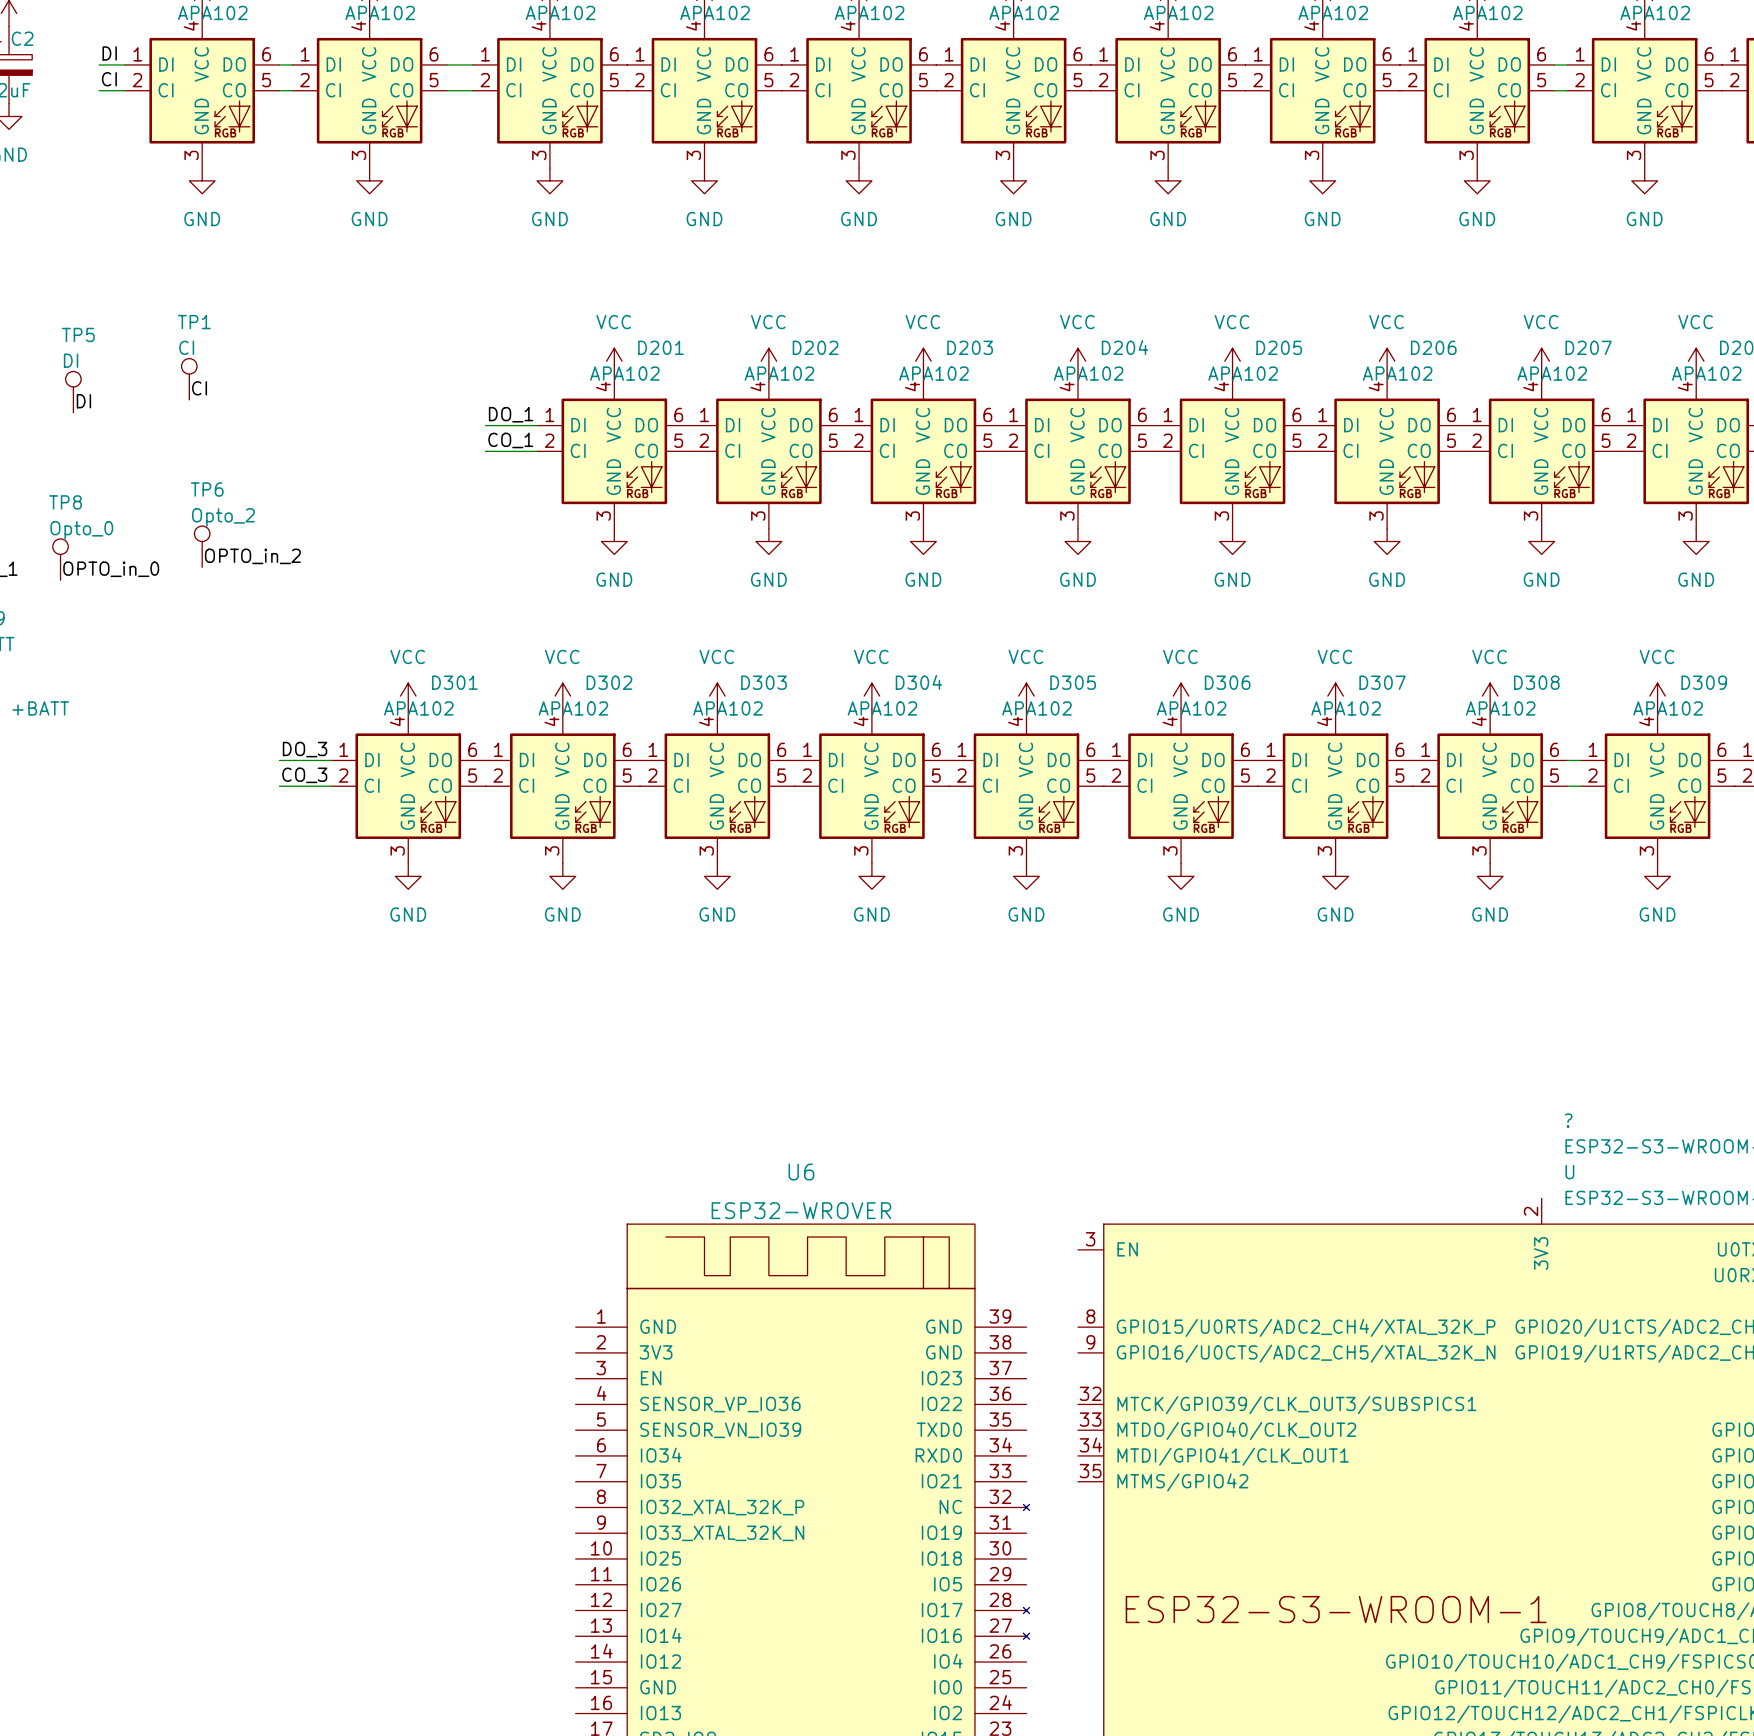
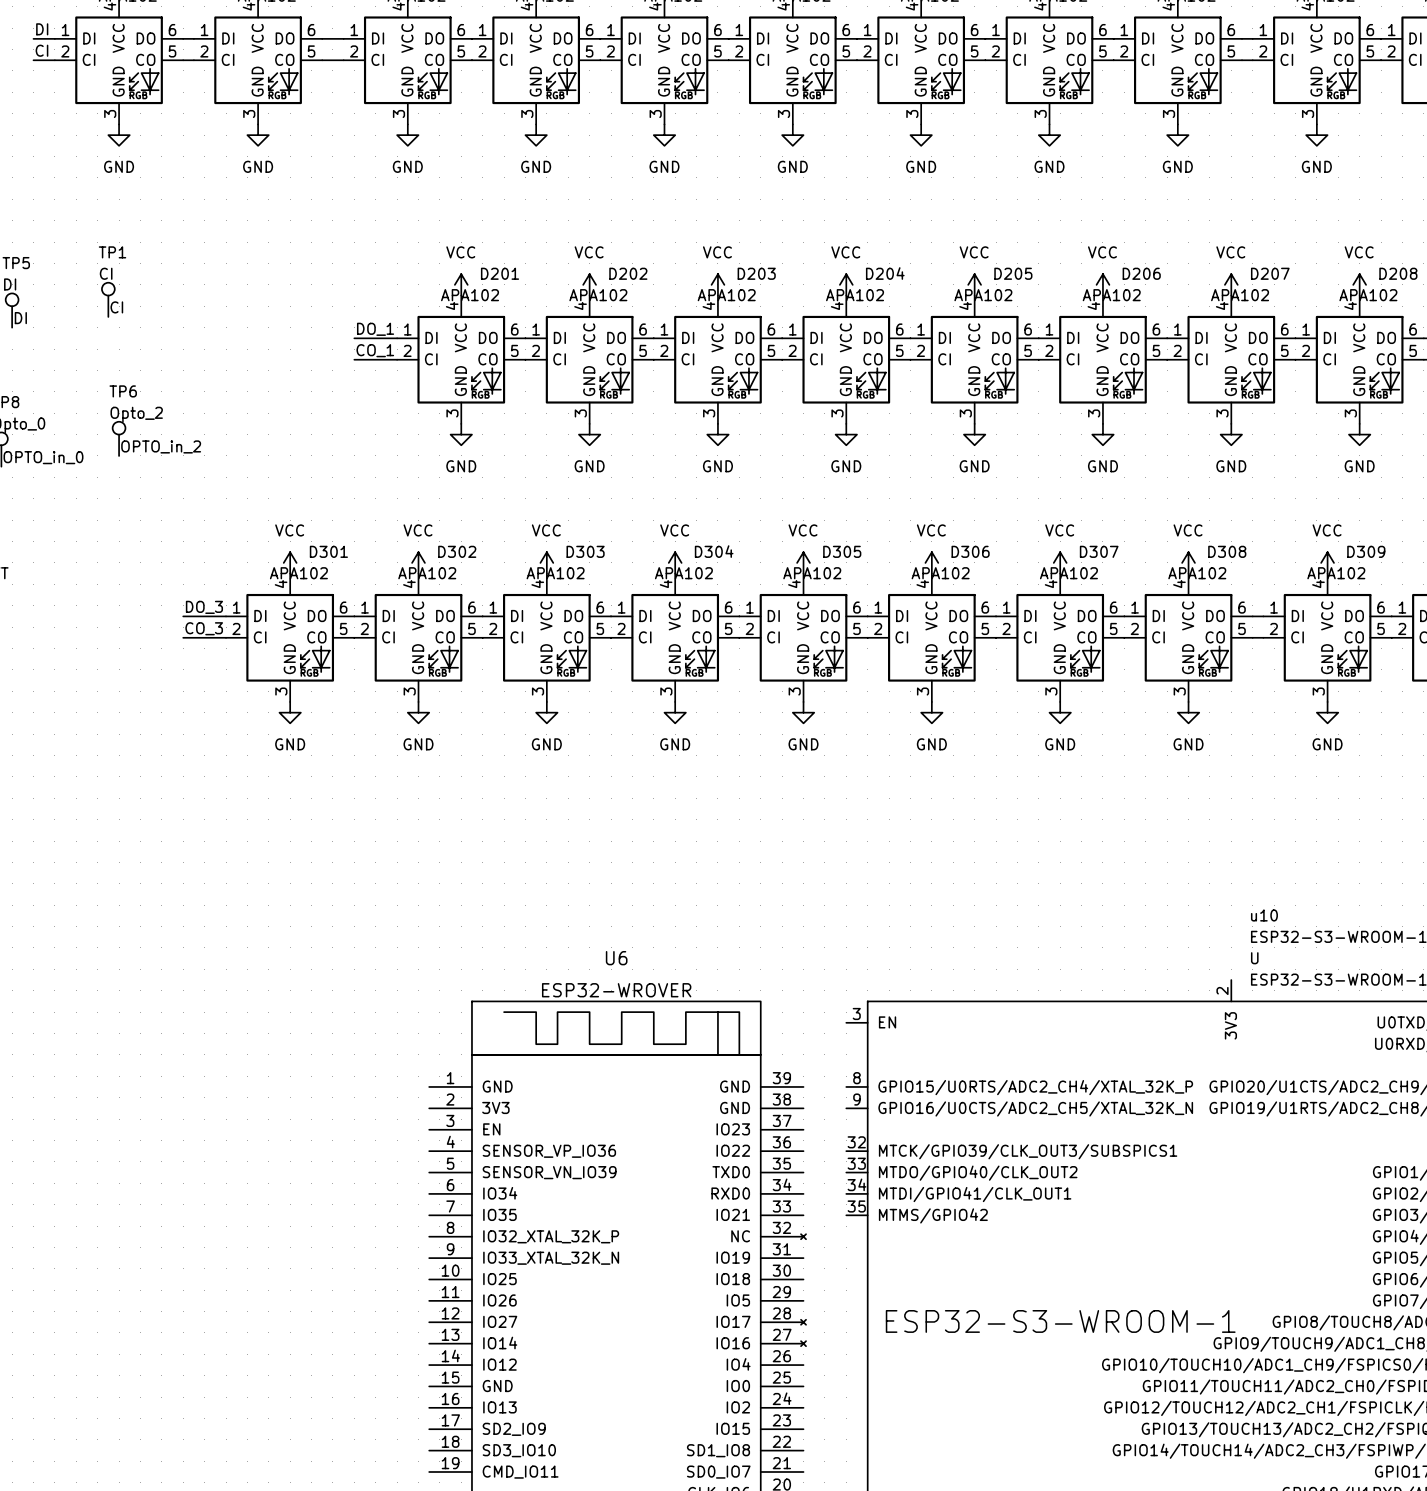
u10 name: ? (1568, 1120) -> u10 (1264, 915)

